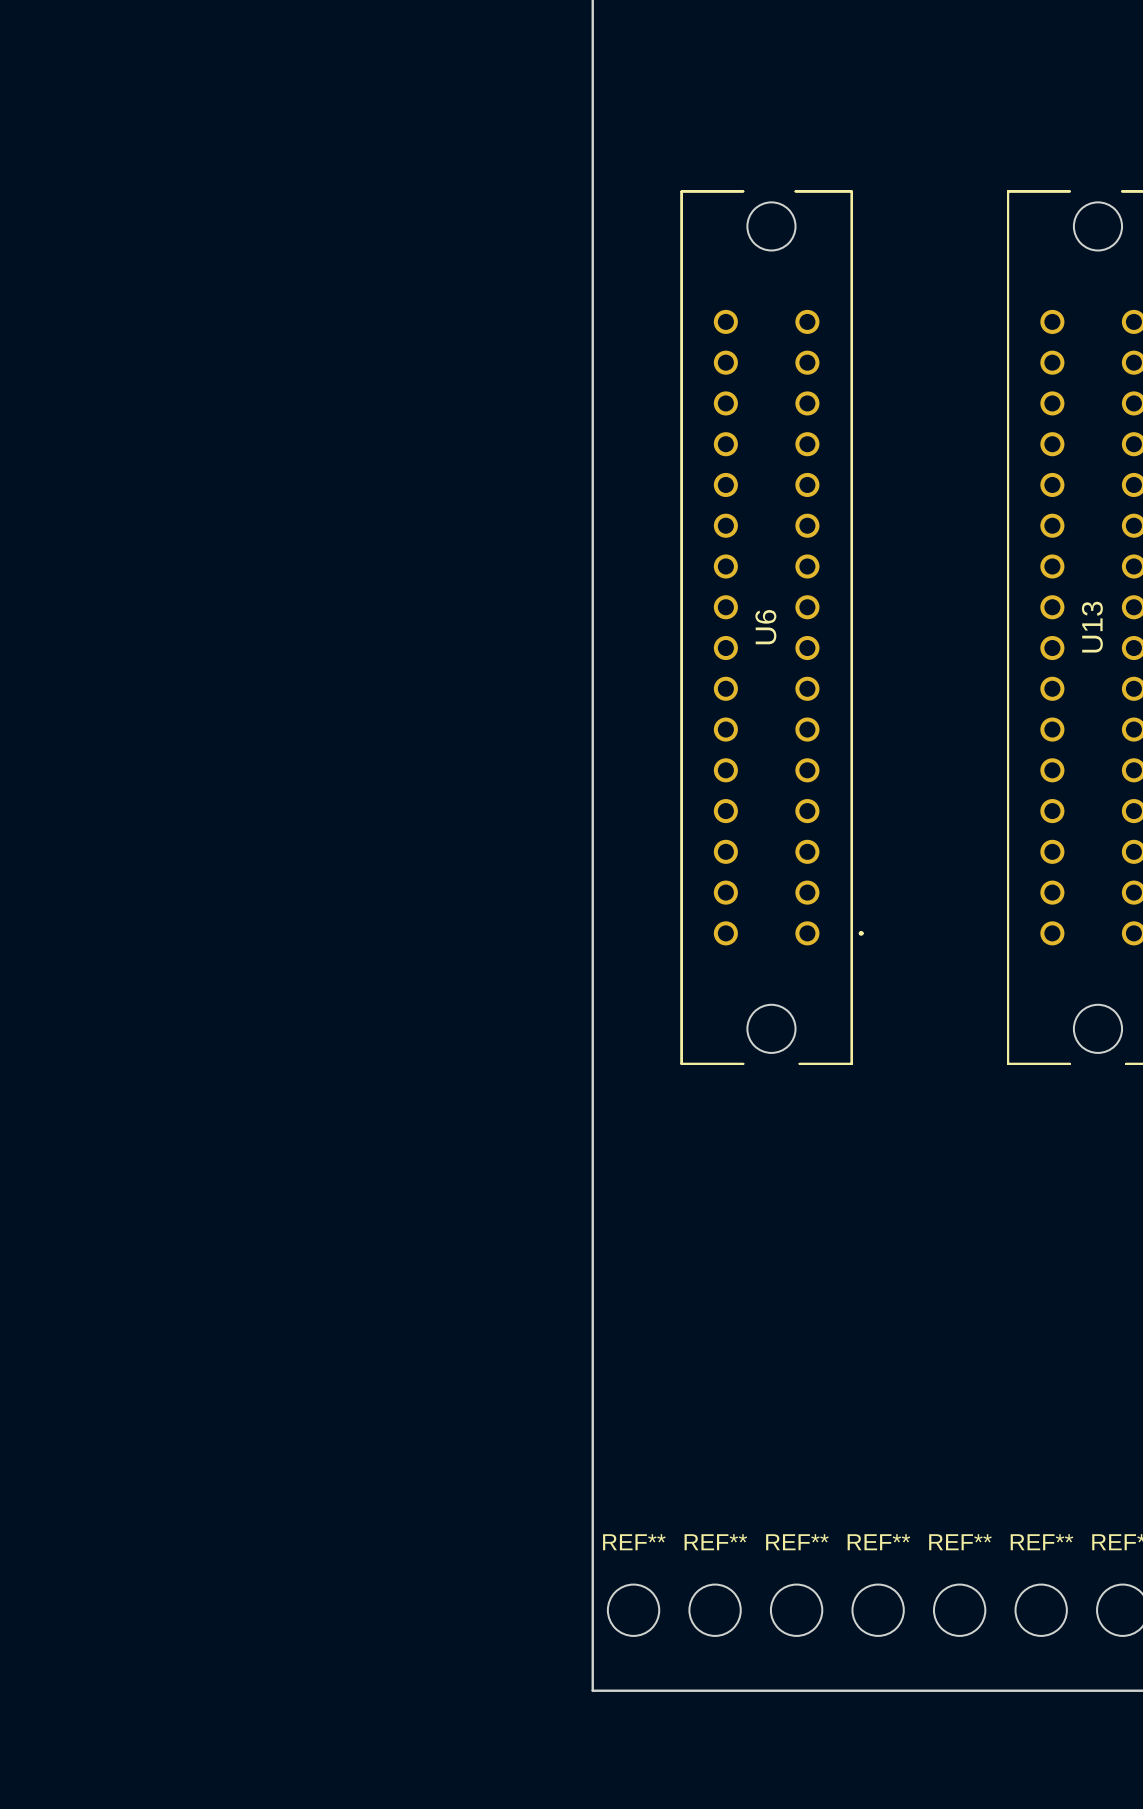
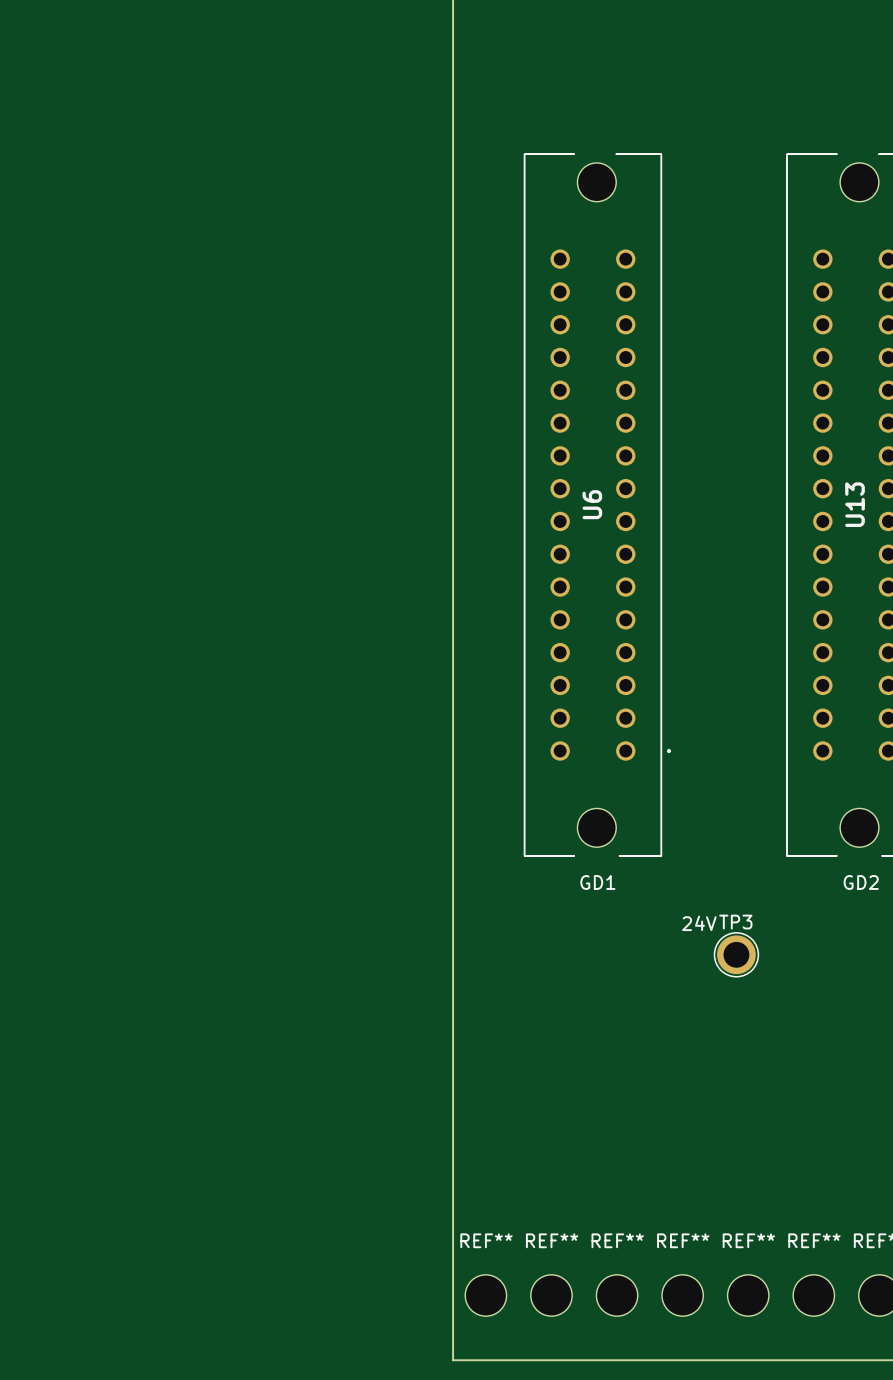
text: none -> GD1 (597, 882)
text: none -> GD2 (861, 882)
text: none -> 24V (699, 923)
TP3: none -> (736, 954)

